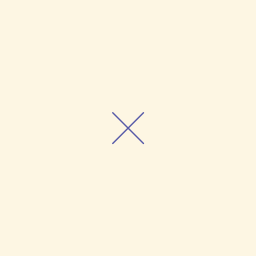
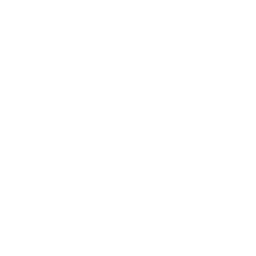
no-connect mark: (128, 128) -> none

